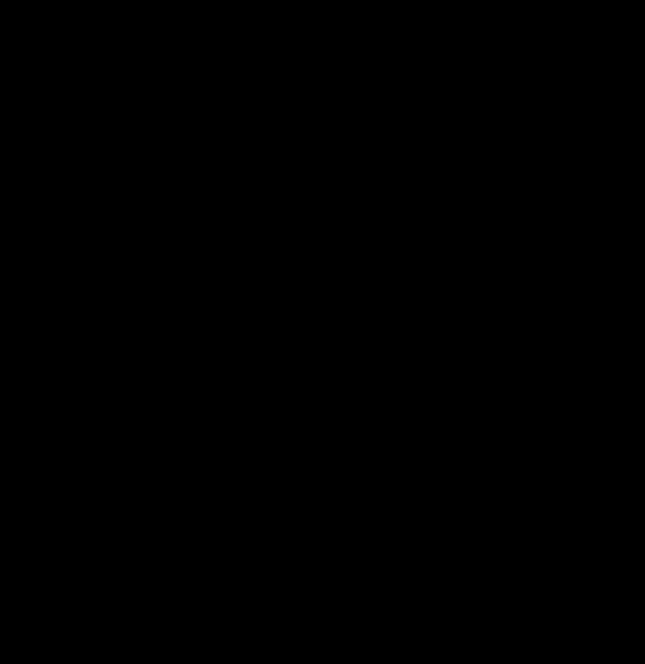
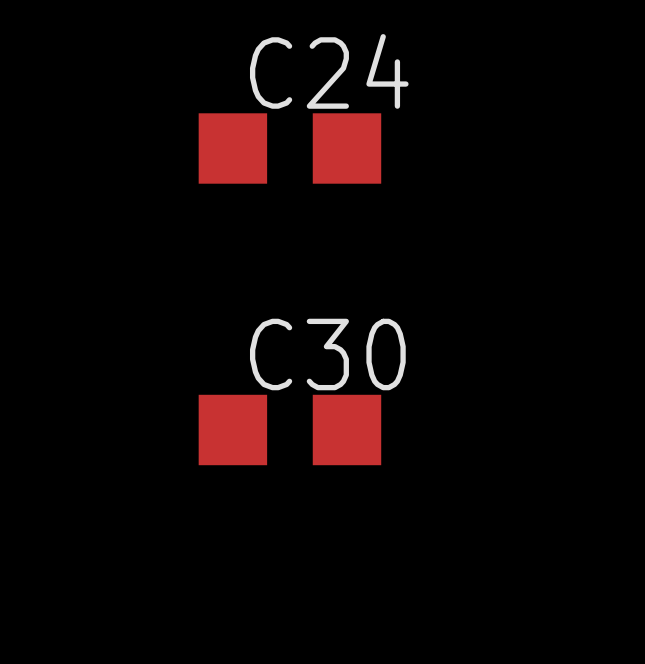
C24: none -> (289, 148)
C30: none -> (289, 429)

